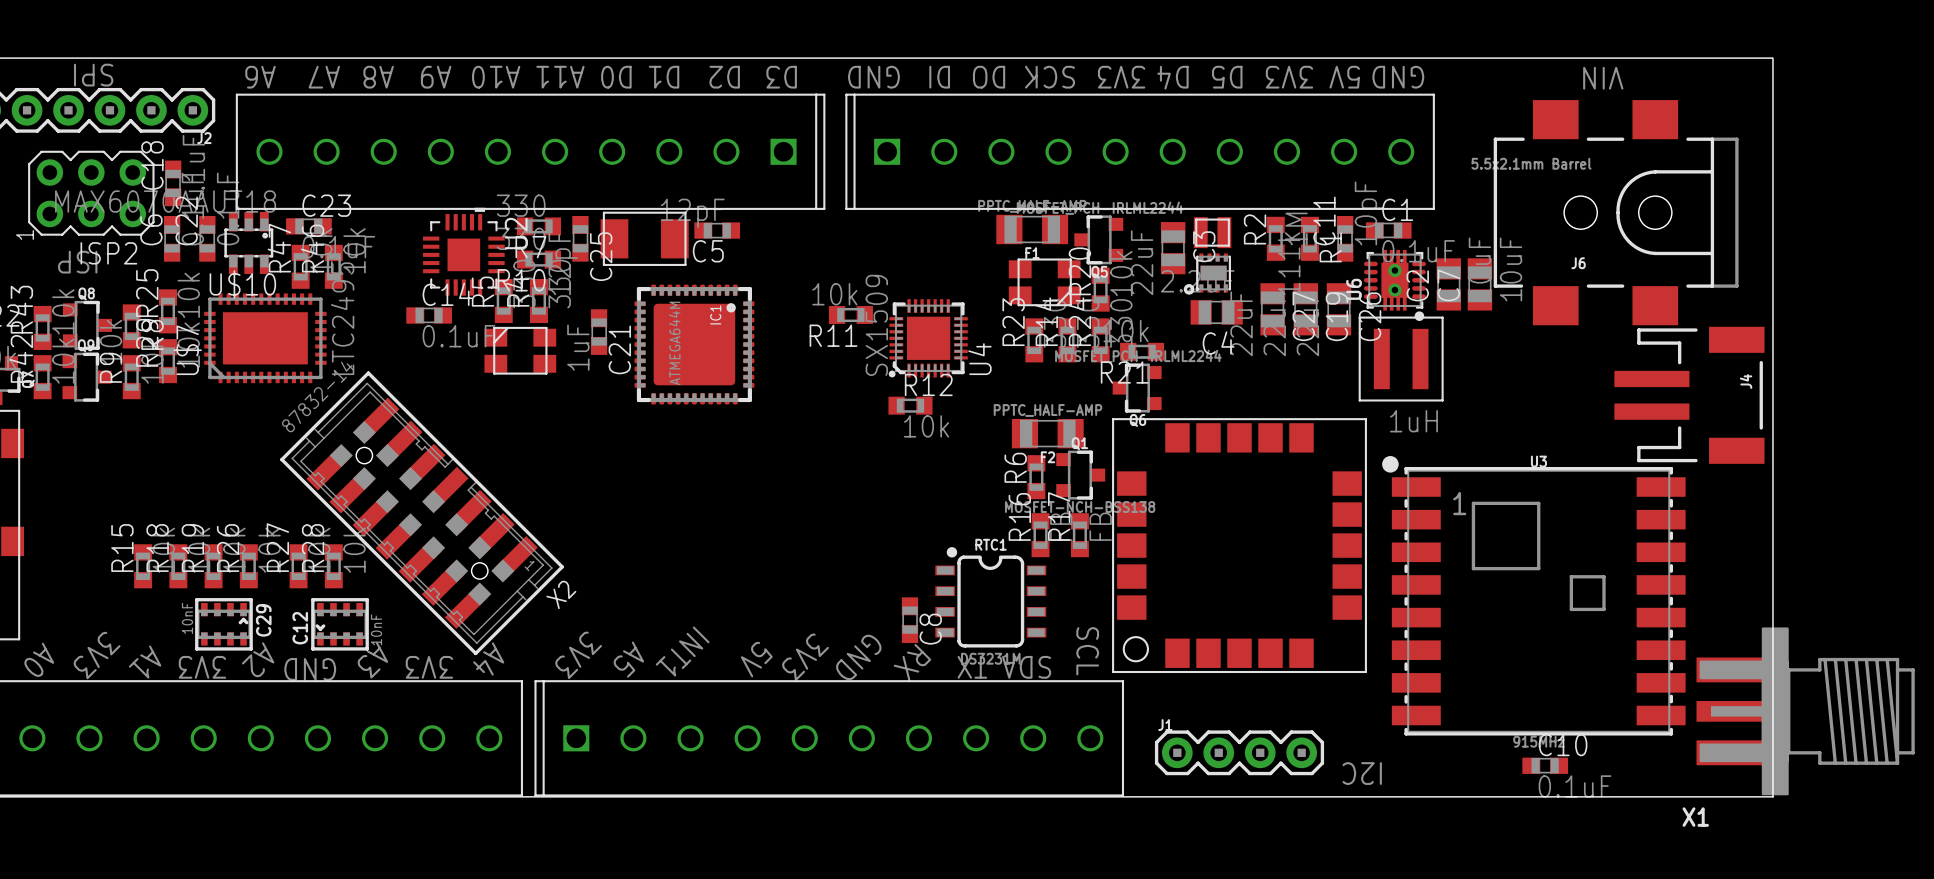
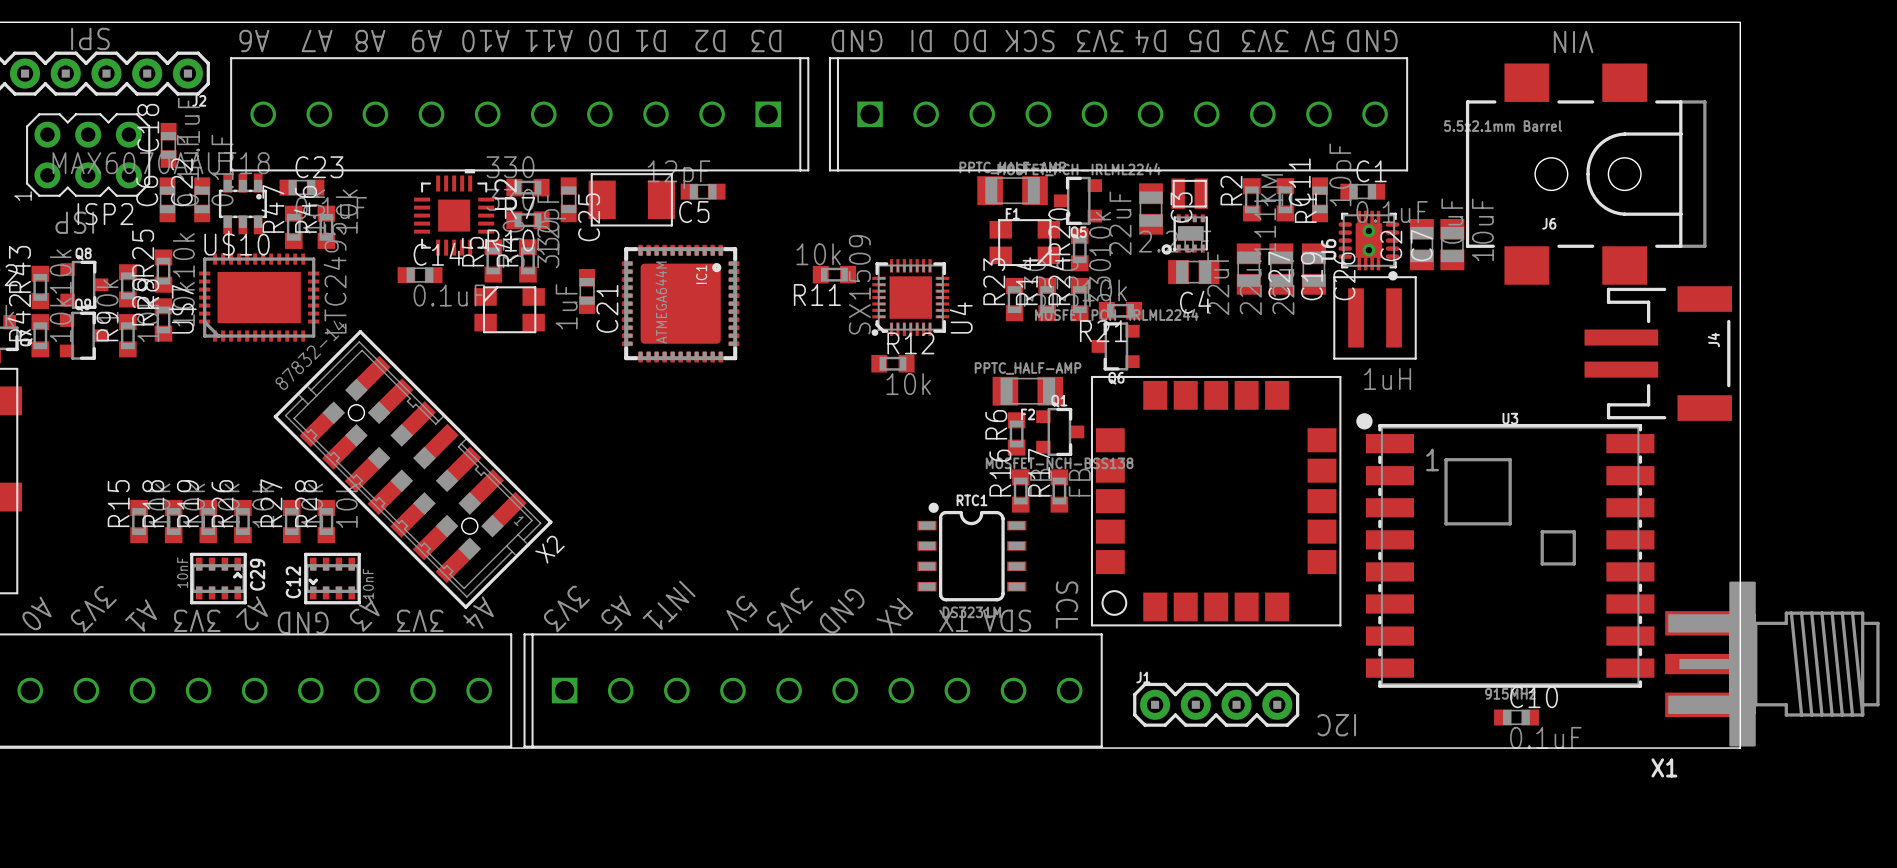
C8: (909, 620) -> none

